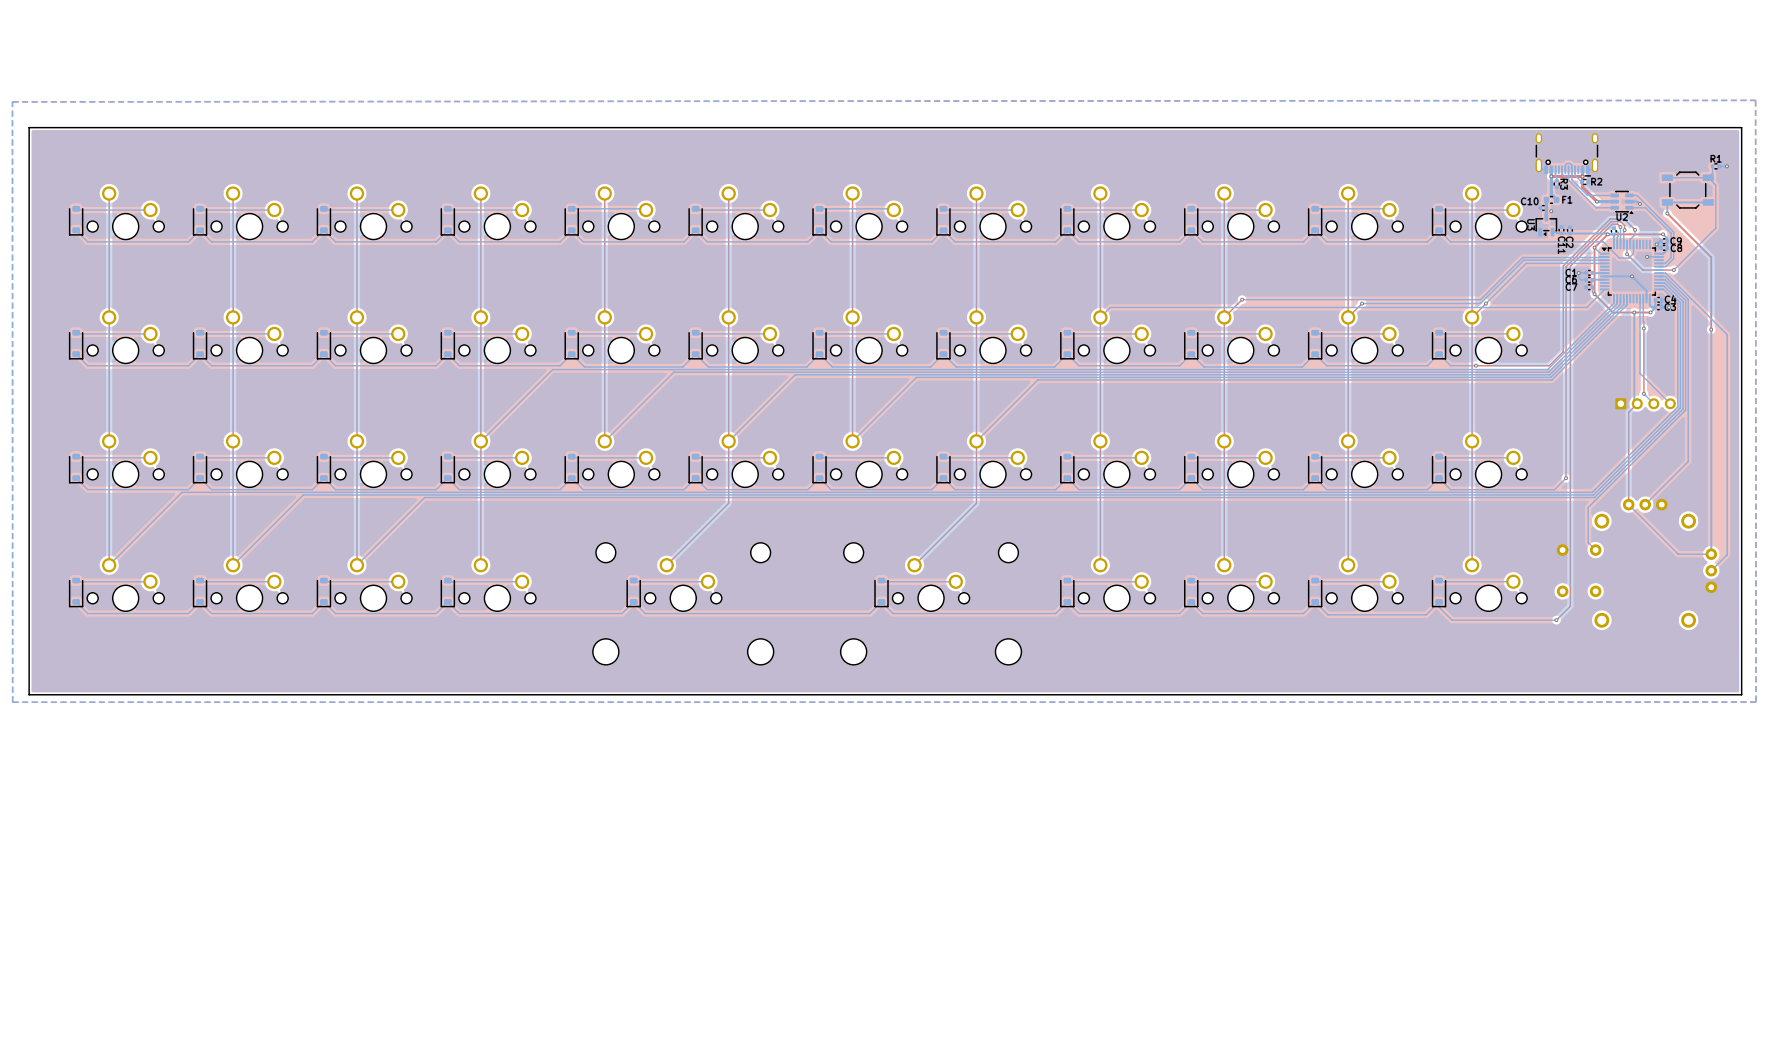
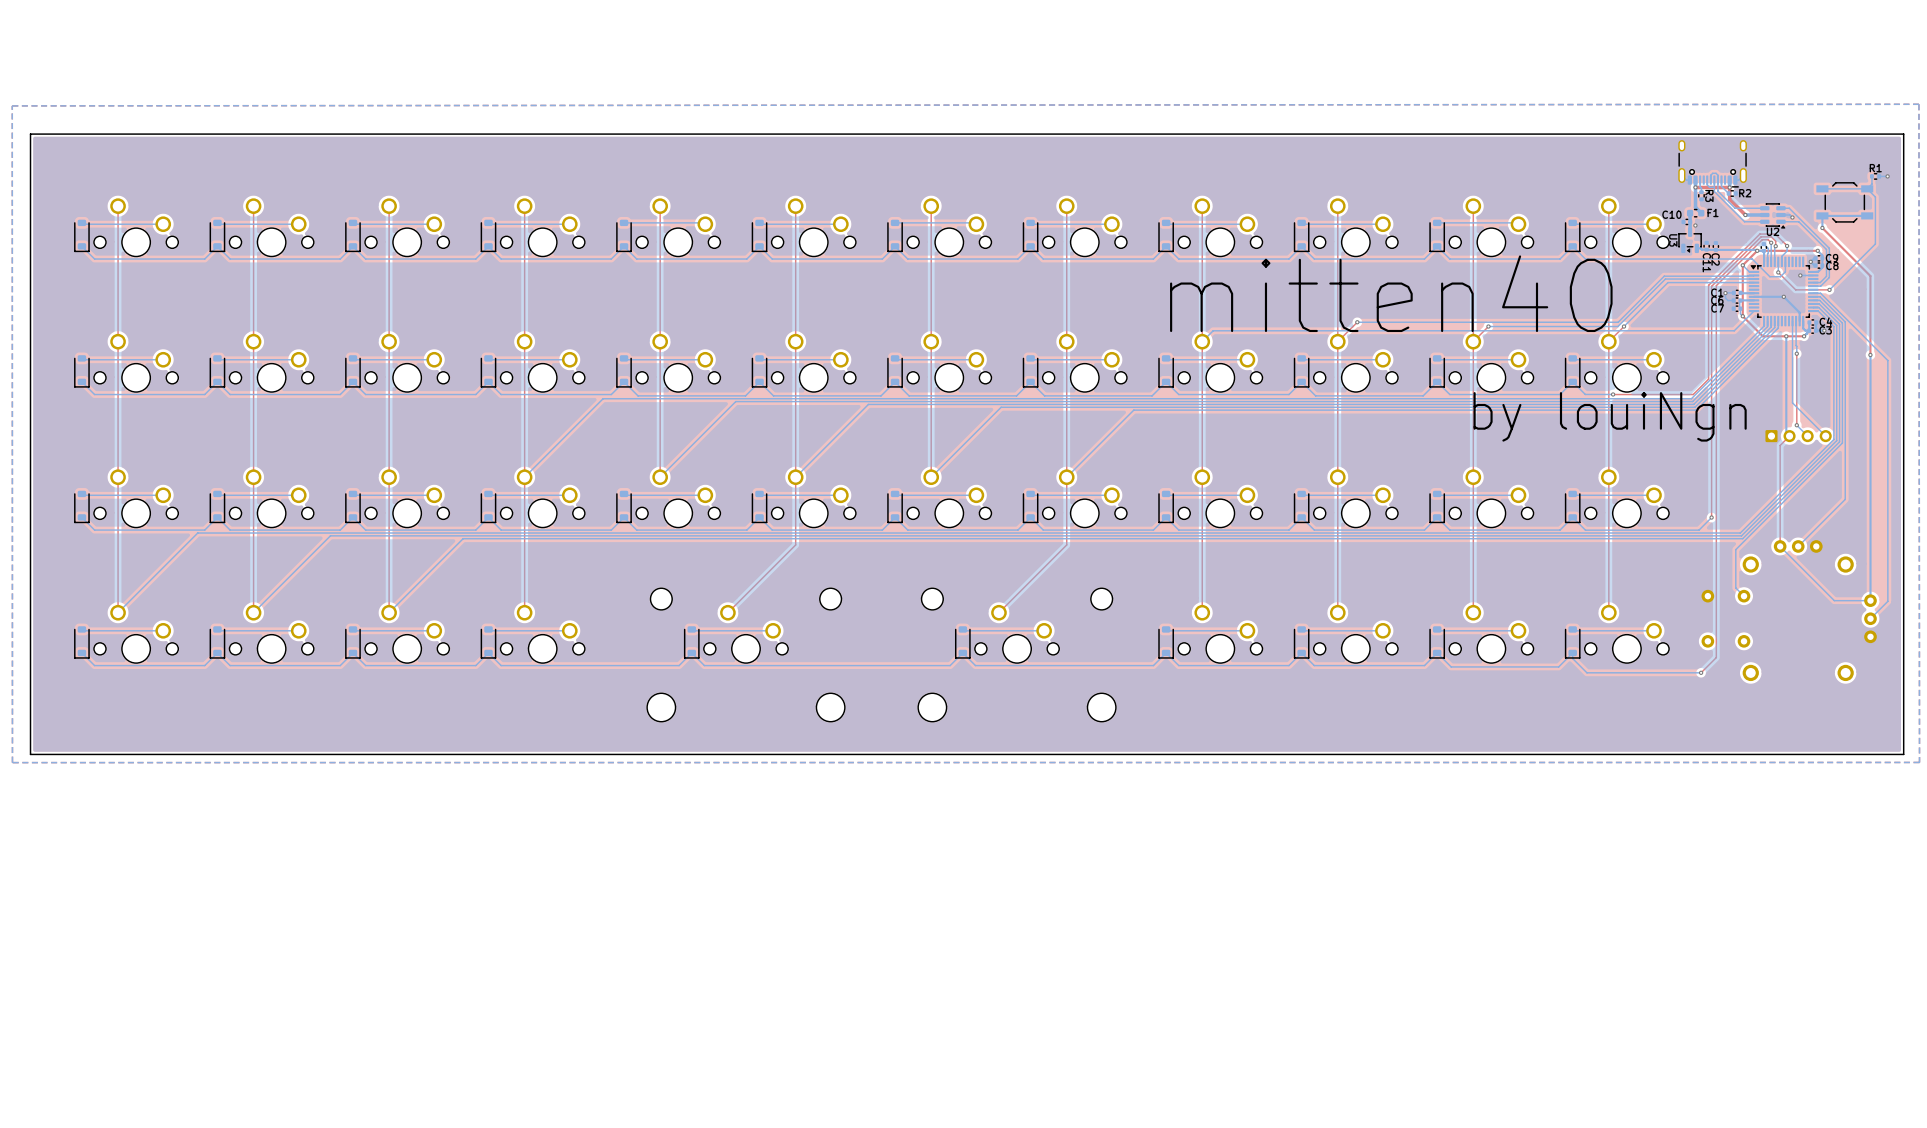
text: none -> mitten40 (1391, 293)
text: none -> by louiNgn (1610, 416)

